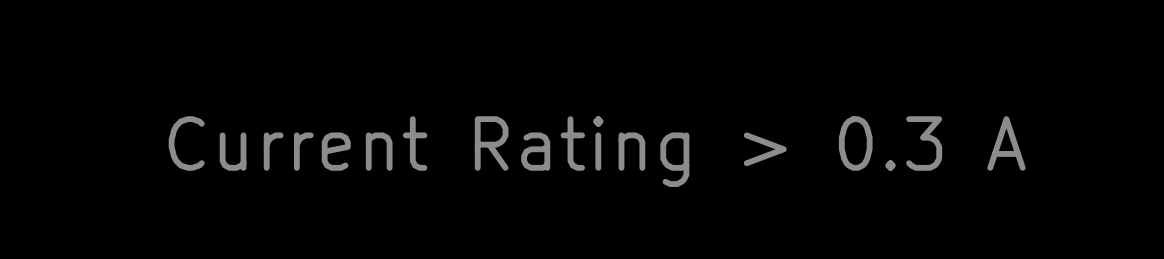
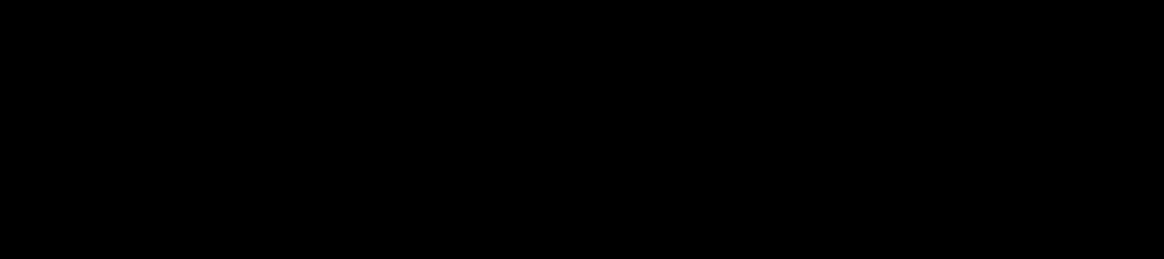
text: Current Rating > 0.3 A (597, 151) -> none

